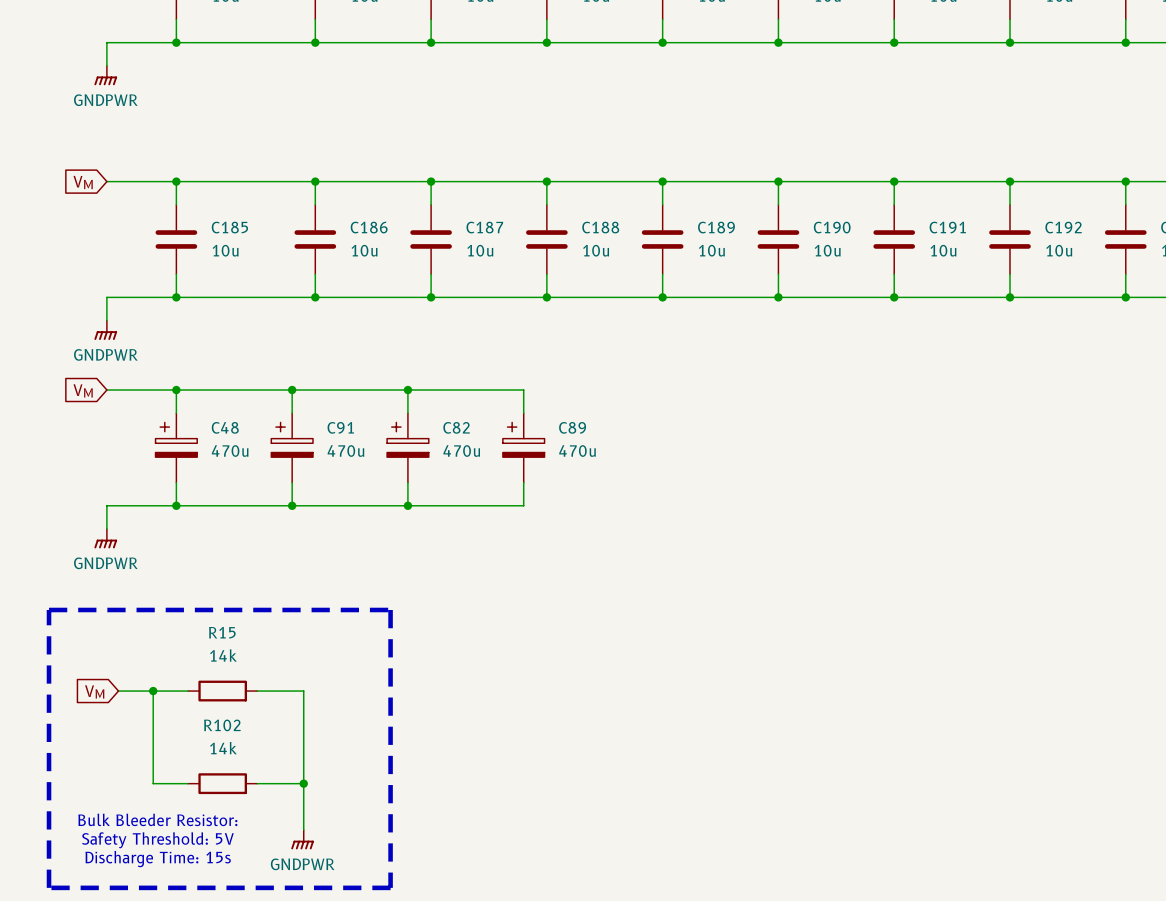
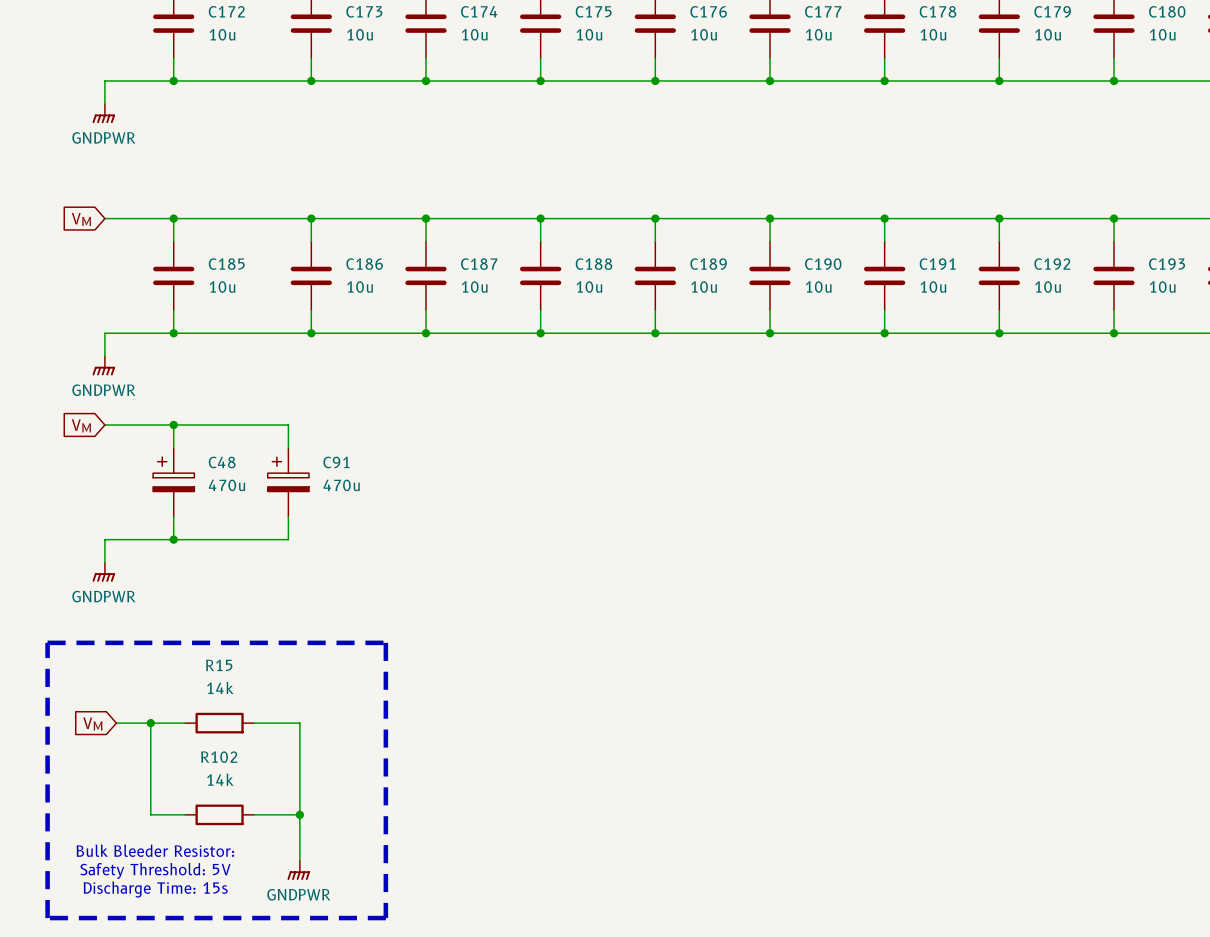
wire: (292, 390) (523, 390) (523, 413) -> none
junction: (292, 390) -> none
wire: (407, 390) (407, 413) -> none
junction: (407, 390) -> none
C82: 470u (407, 447) -> none
C89: 470u (523, 447) -> none
wire: (407, 482) (407, 505) -> none
wire: (523, 482) (523, 505) (292, 505) -> none
junction: (292, 505) -> none
junction: (407, 505) -> none

